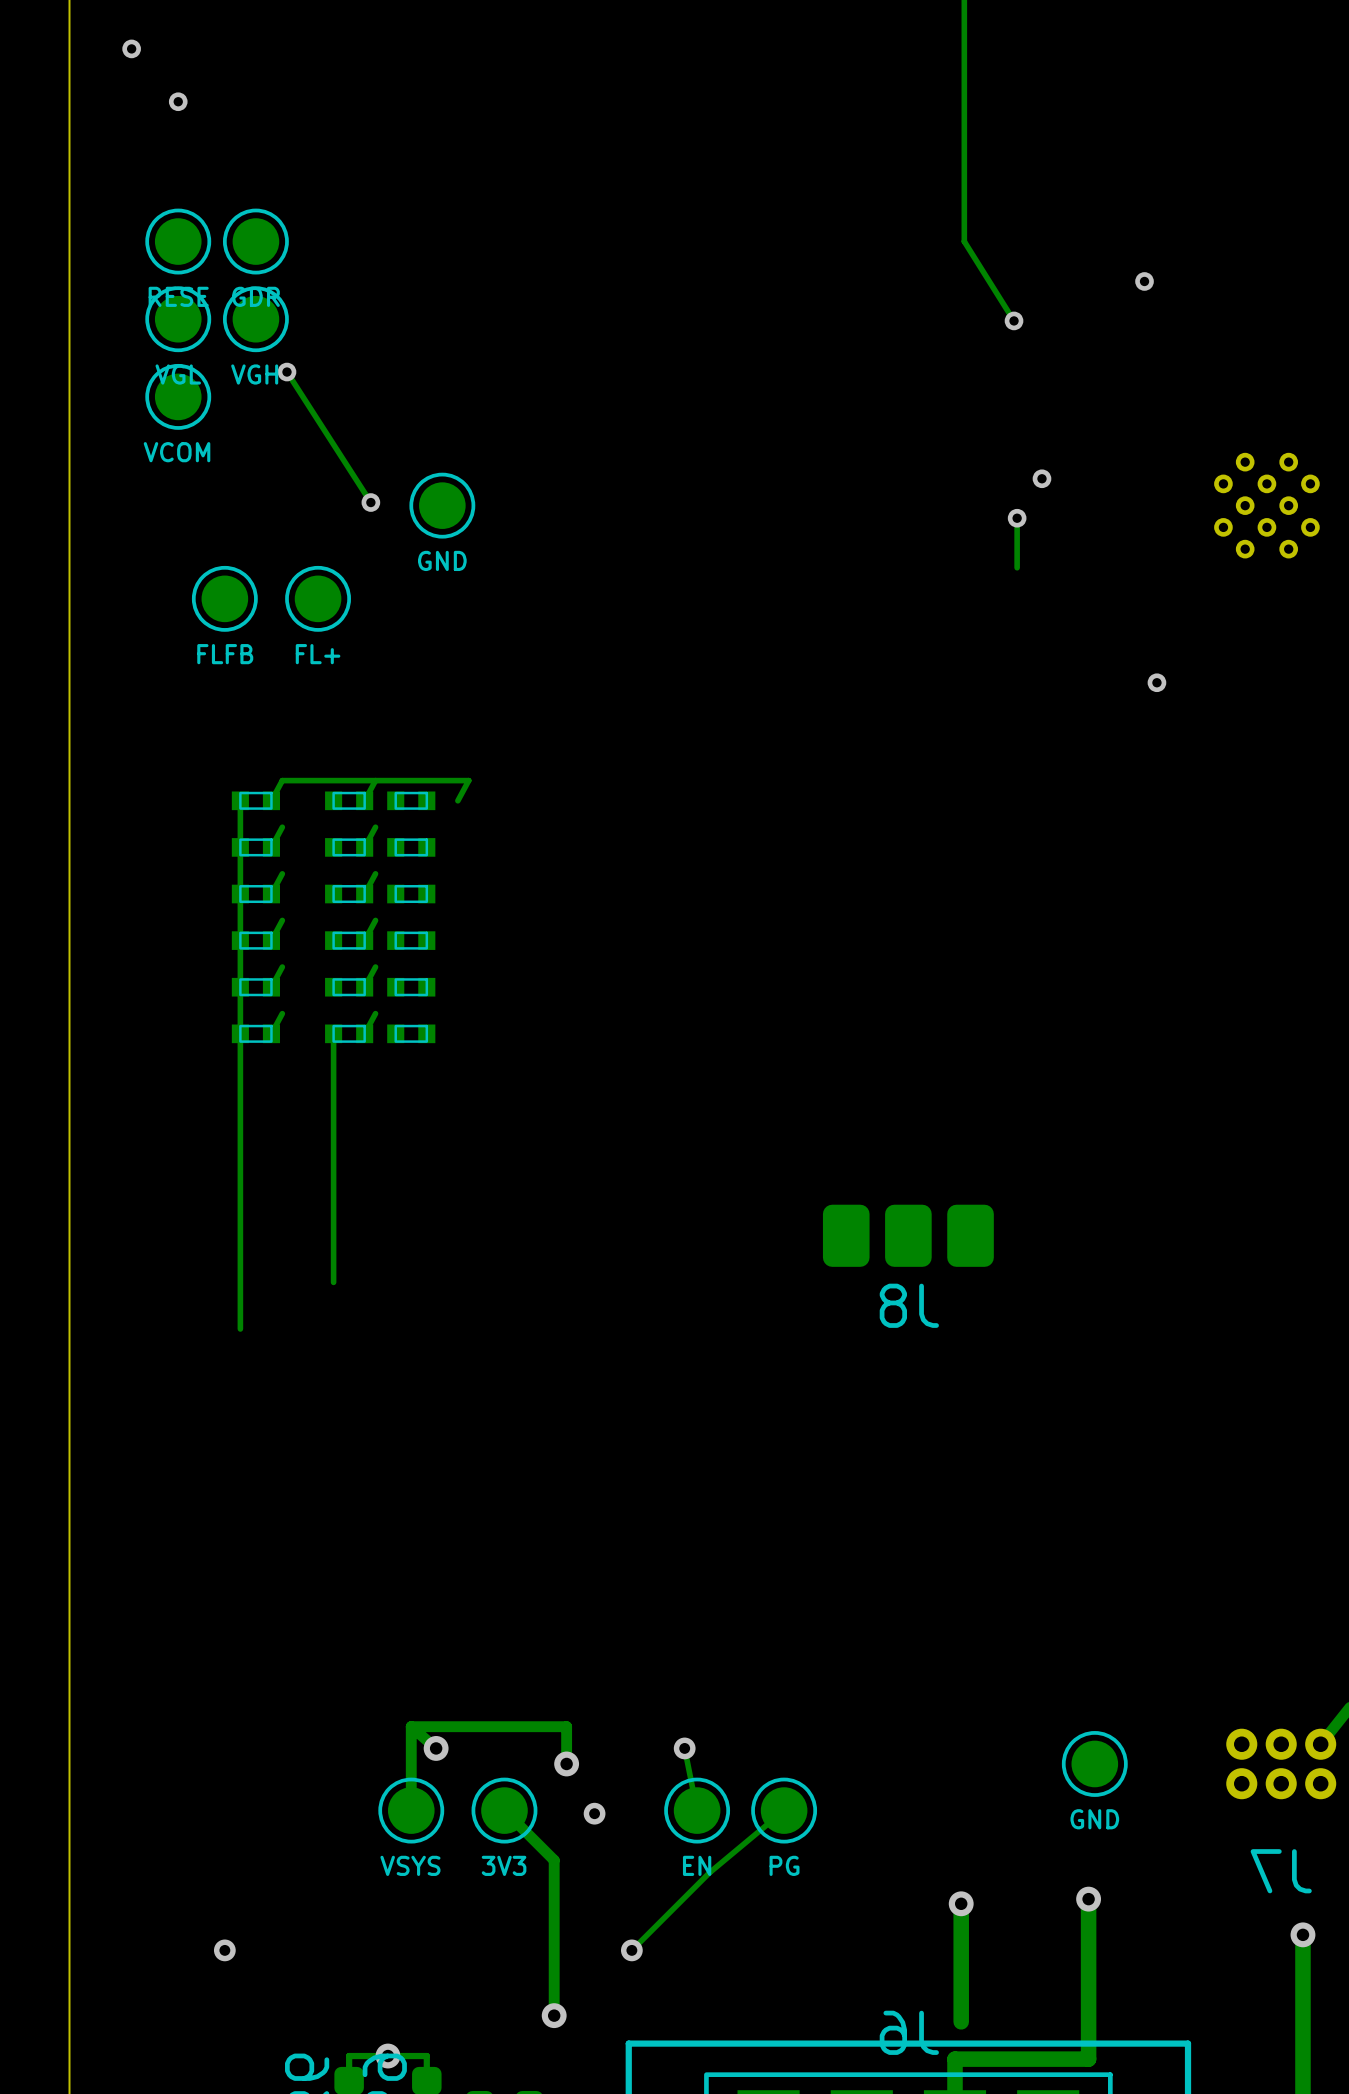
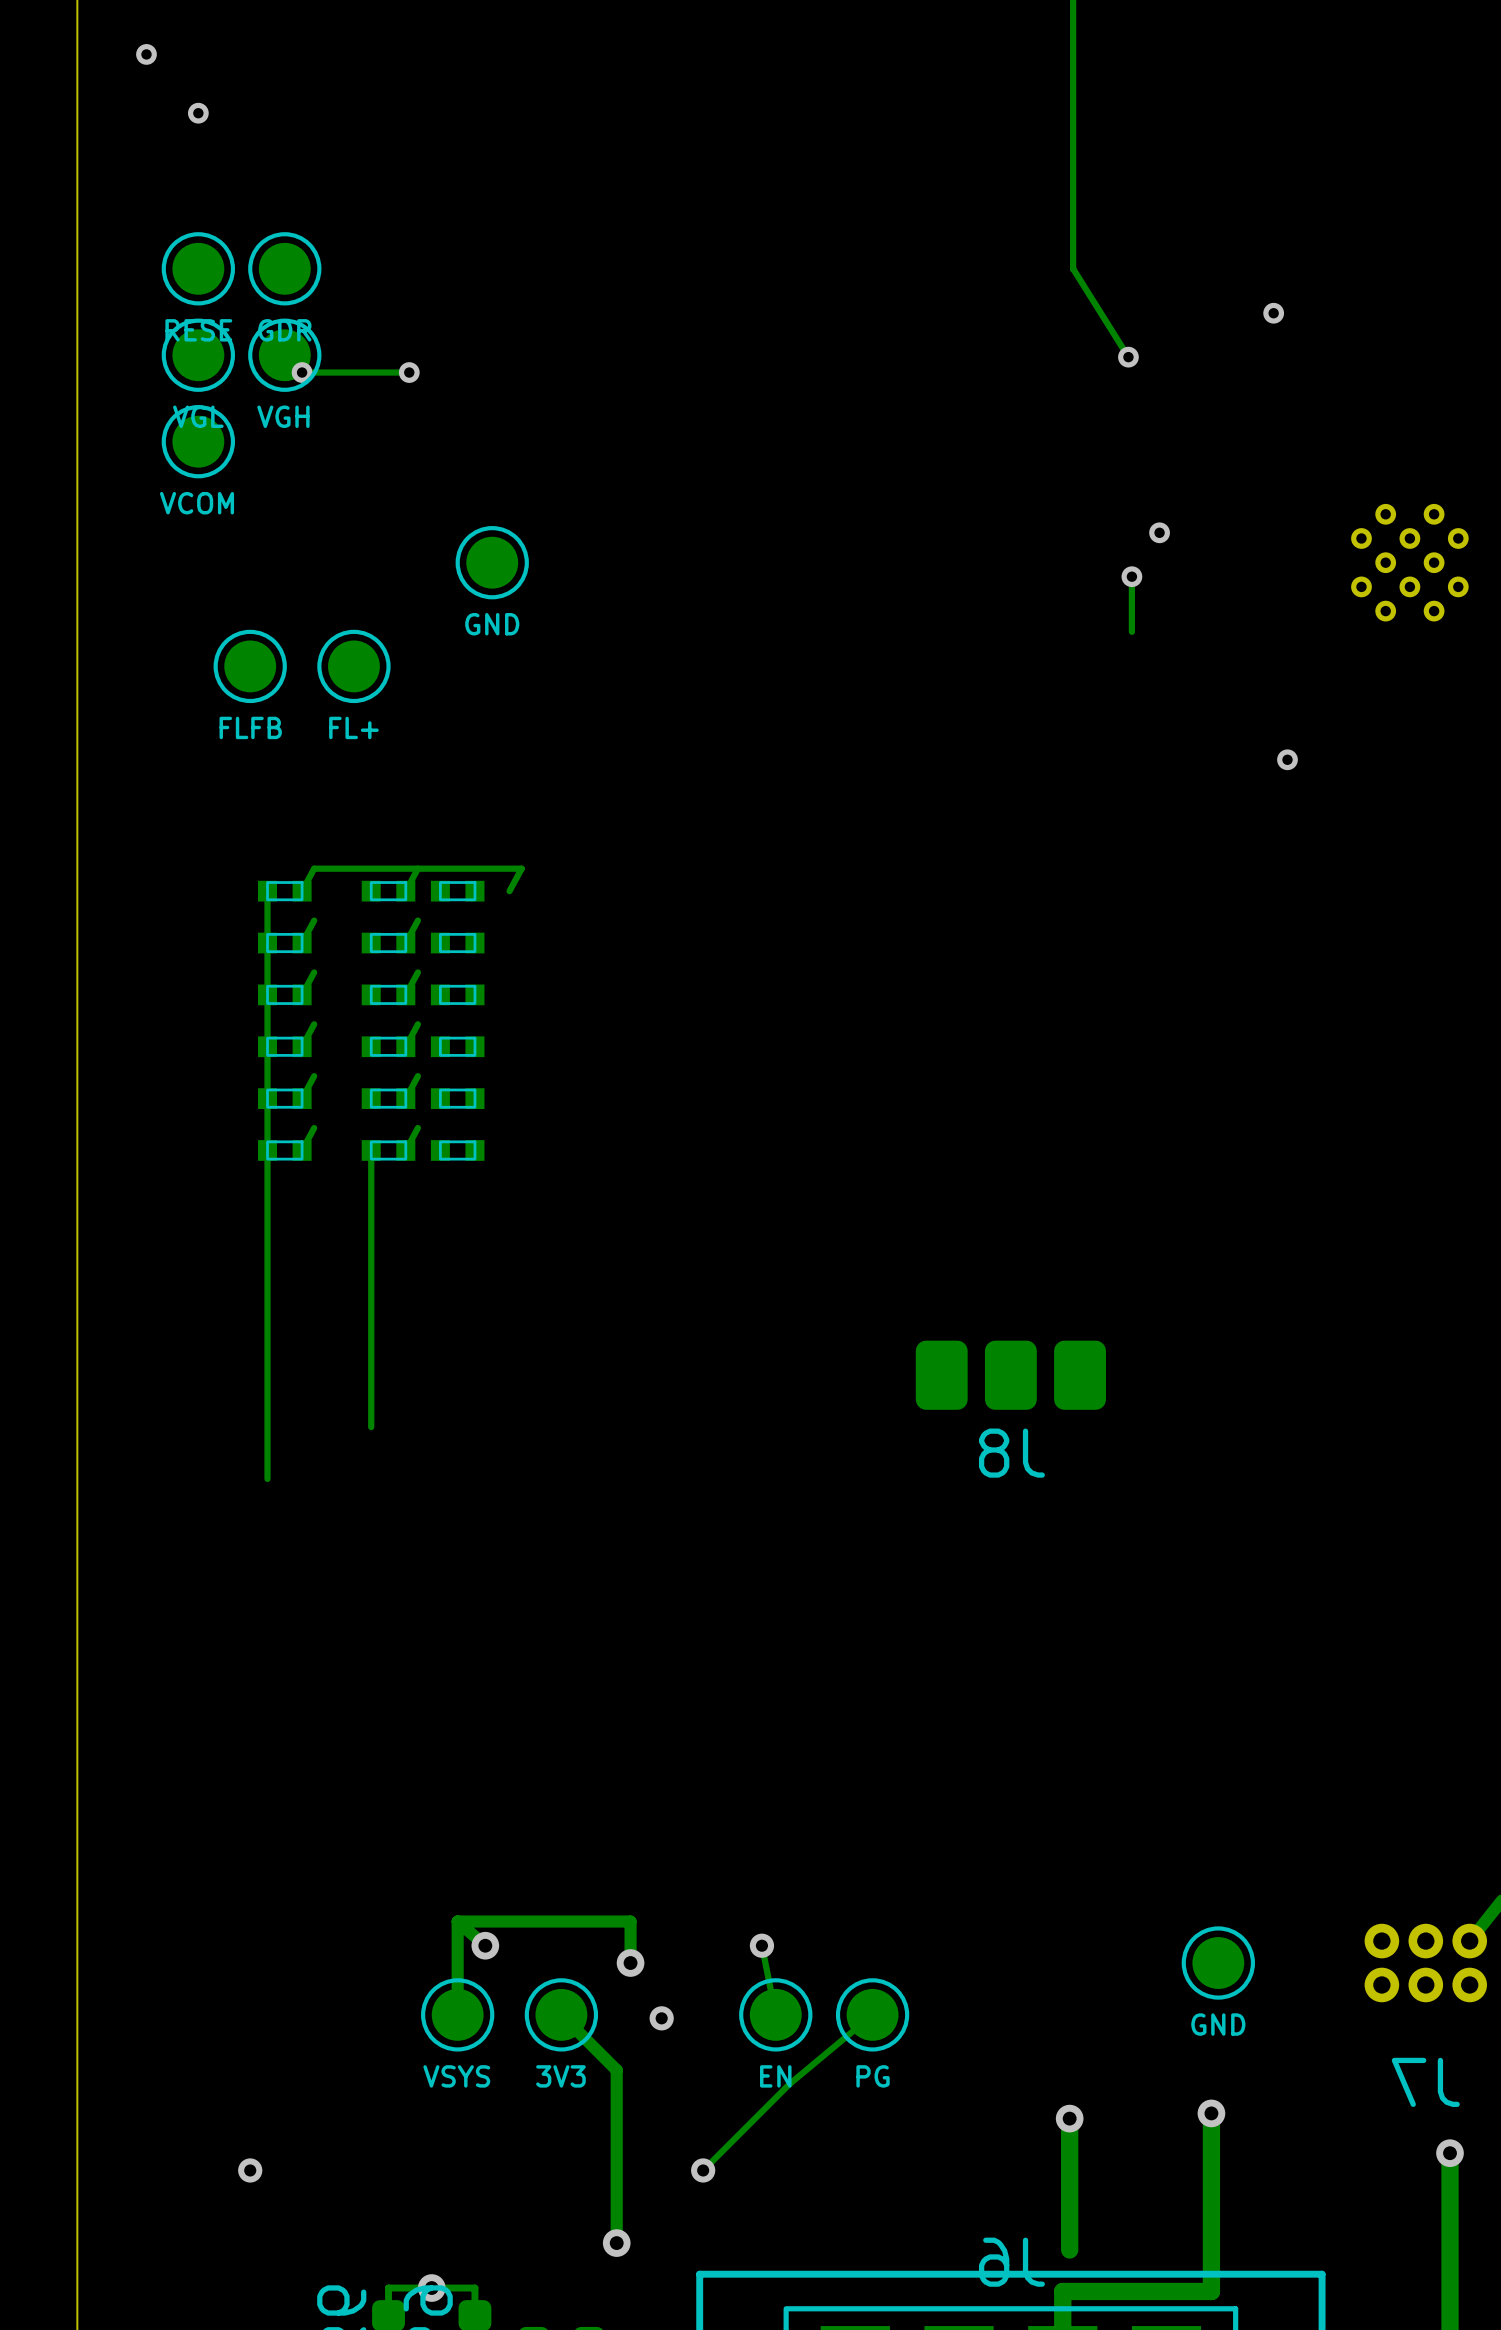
track: none -> (409, 372) (302, 372)
via: none -> (409, 372)
track: (286, 372) (370, 502) -> none
via position: (286, 372) -> (302, 372)
via: (370, 502) -> none

